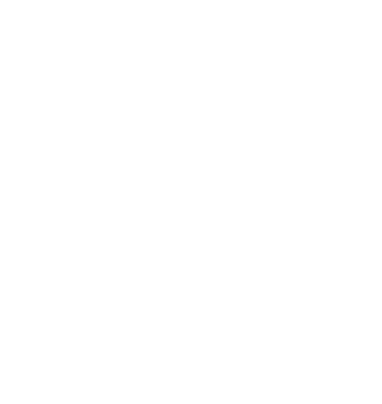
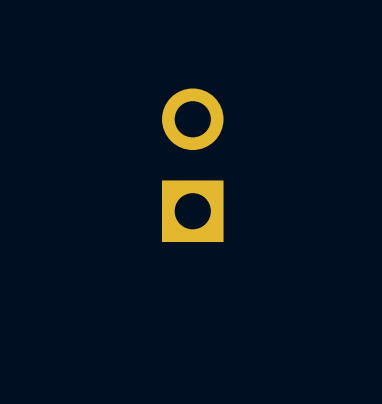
part: none -> (192, 165)

